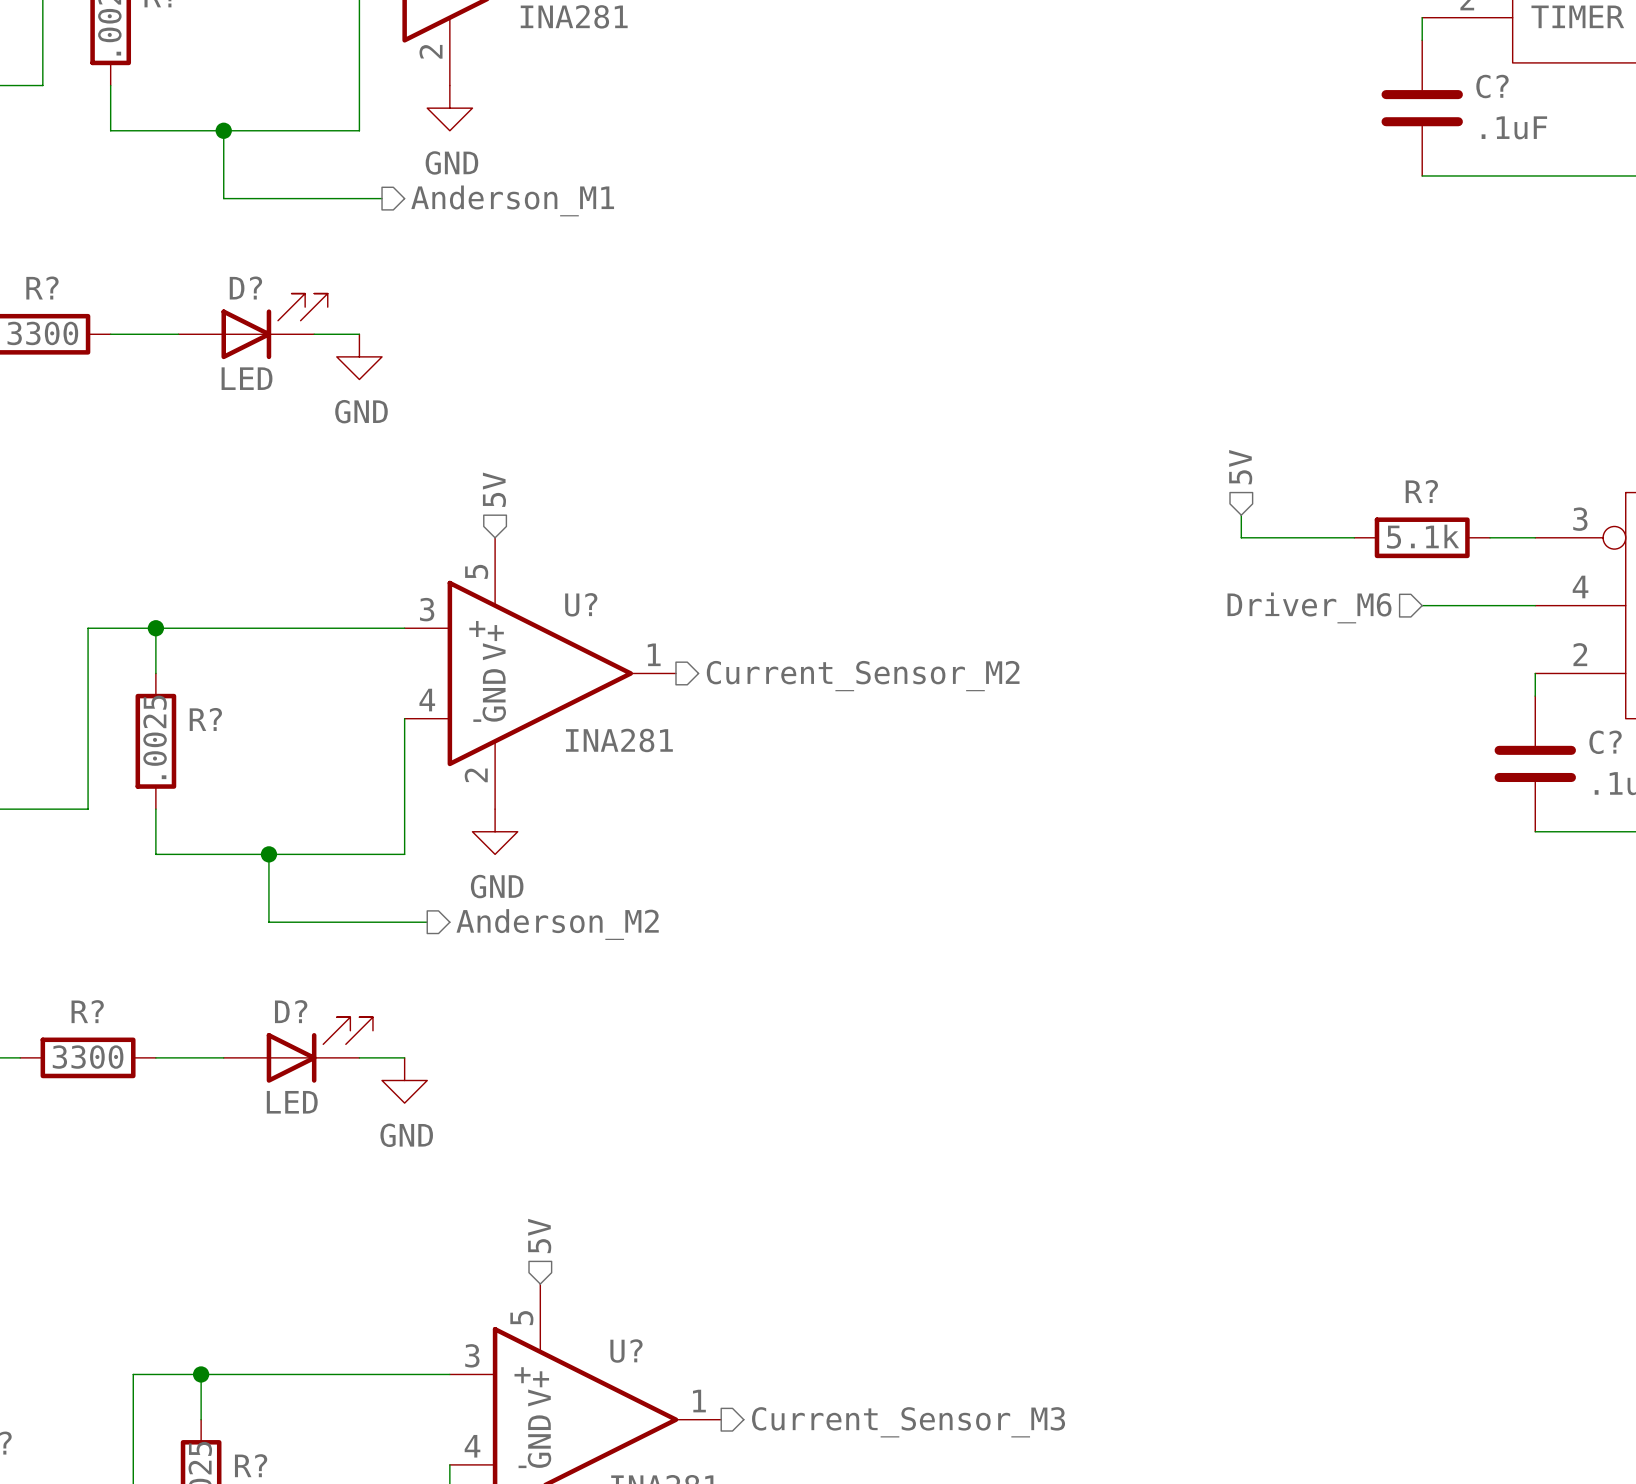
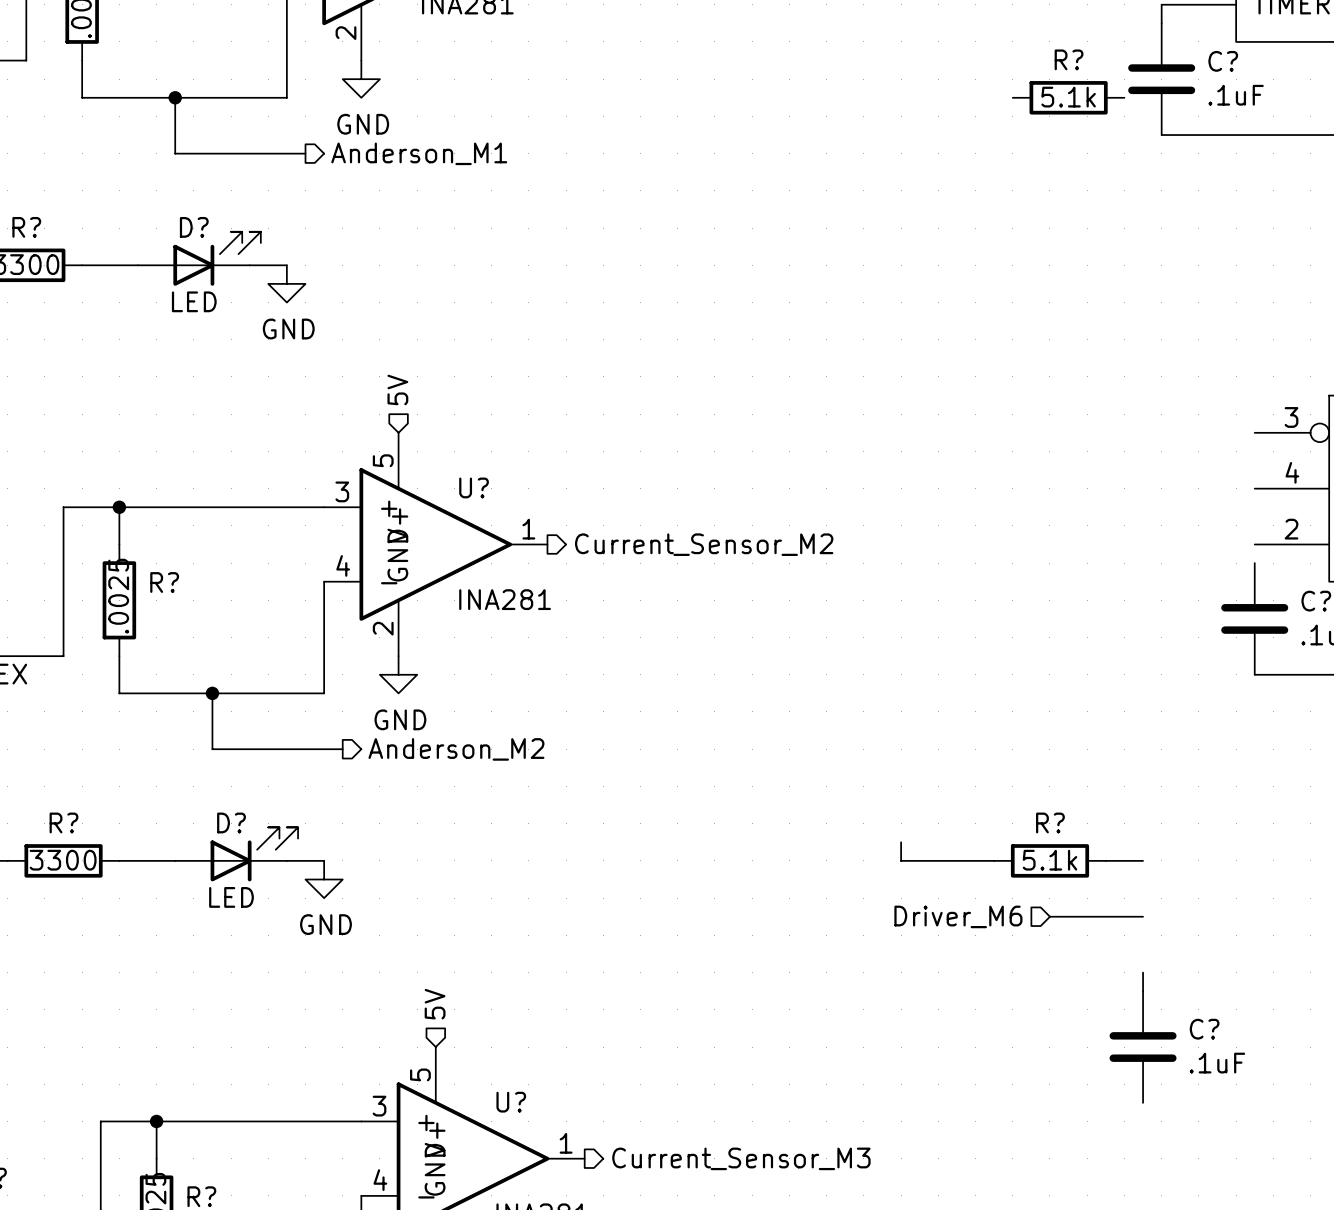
R?: none -> 5.1k (1068, 97)
hierarchical label: 5V (1240, 467) -> none
wire: (1241, 515) (1241, 537) (1354, 537) -> none
R?: 5.1k (1422, 537) -> none
wire: (1490, 537) (1535, 537) -> none
wire: (1422, 605) (1535, 605) -> none
hierarchical label: Driver_M6 (1309, 607) -> none
wire: (1535, 673) (1535, 696) -> none
wire: none -> (901, 842) (901, 860) (994, 860)
R?: none -> 5.1k (1049, 860)
wire: none -> (1105, 860) (1143, 860)
wire: none -> (1049, 916) (1143, 916)
hierarchical label: none -> Driver_M6 (958, 916)
wire: none -> (1143, 972) (1143, 991)
C?: none -> .1uF (1143, 1047)

